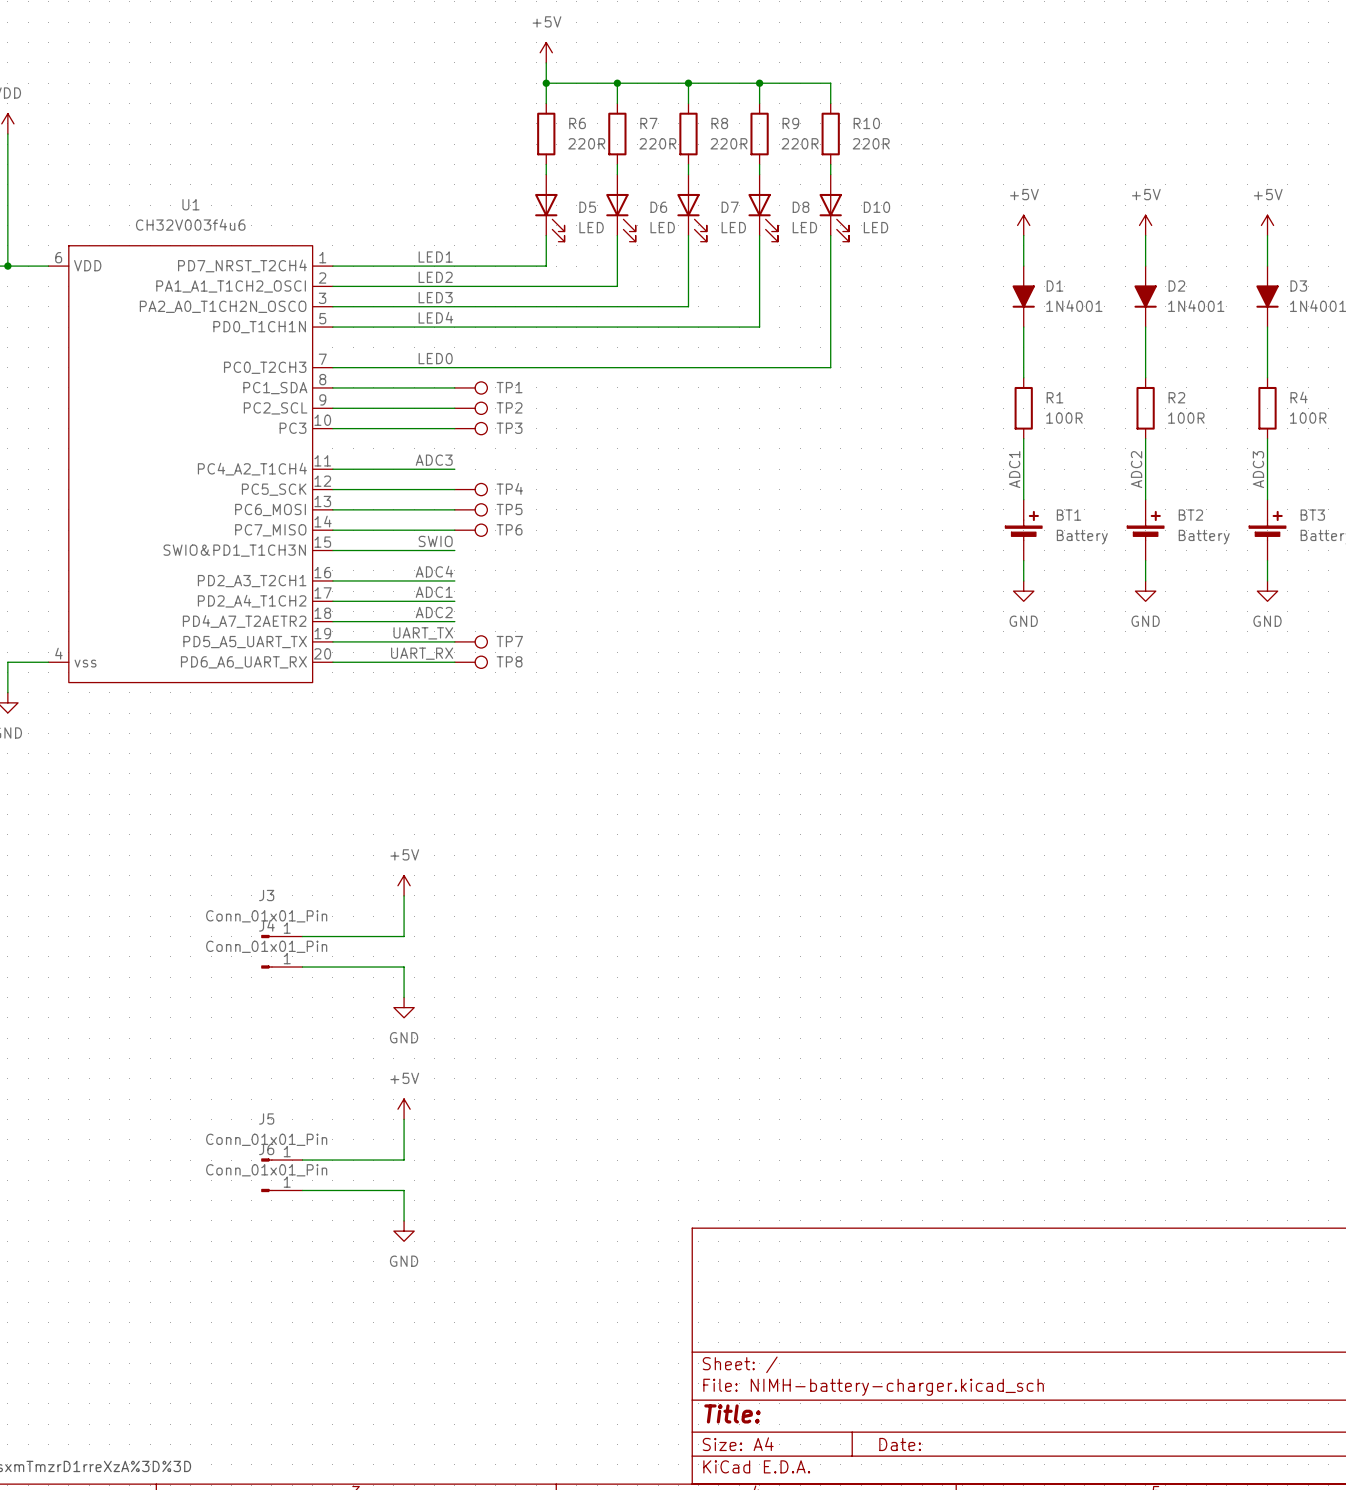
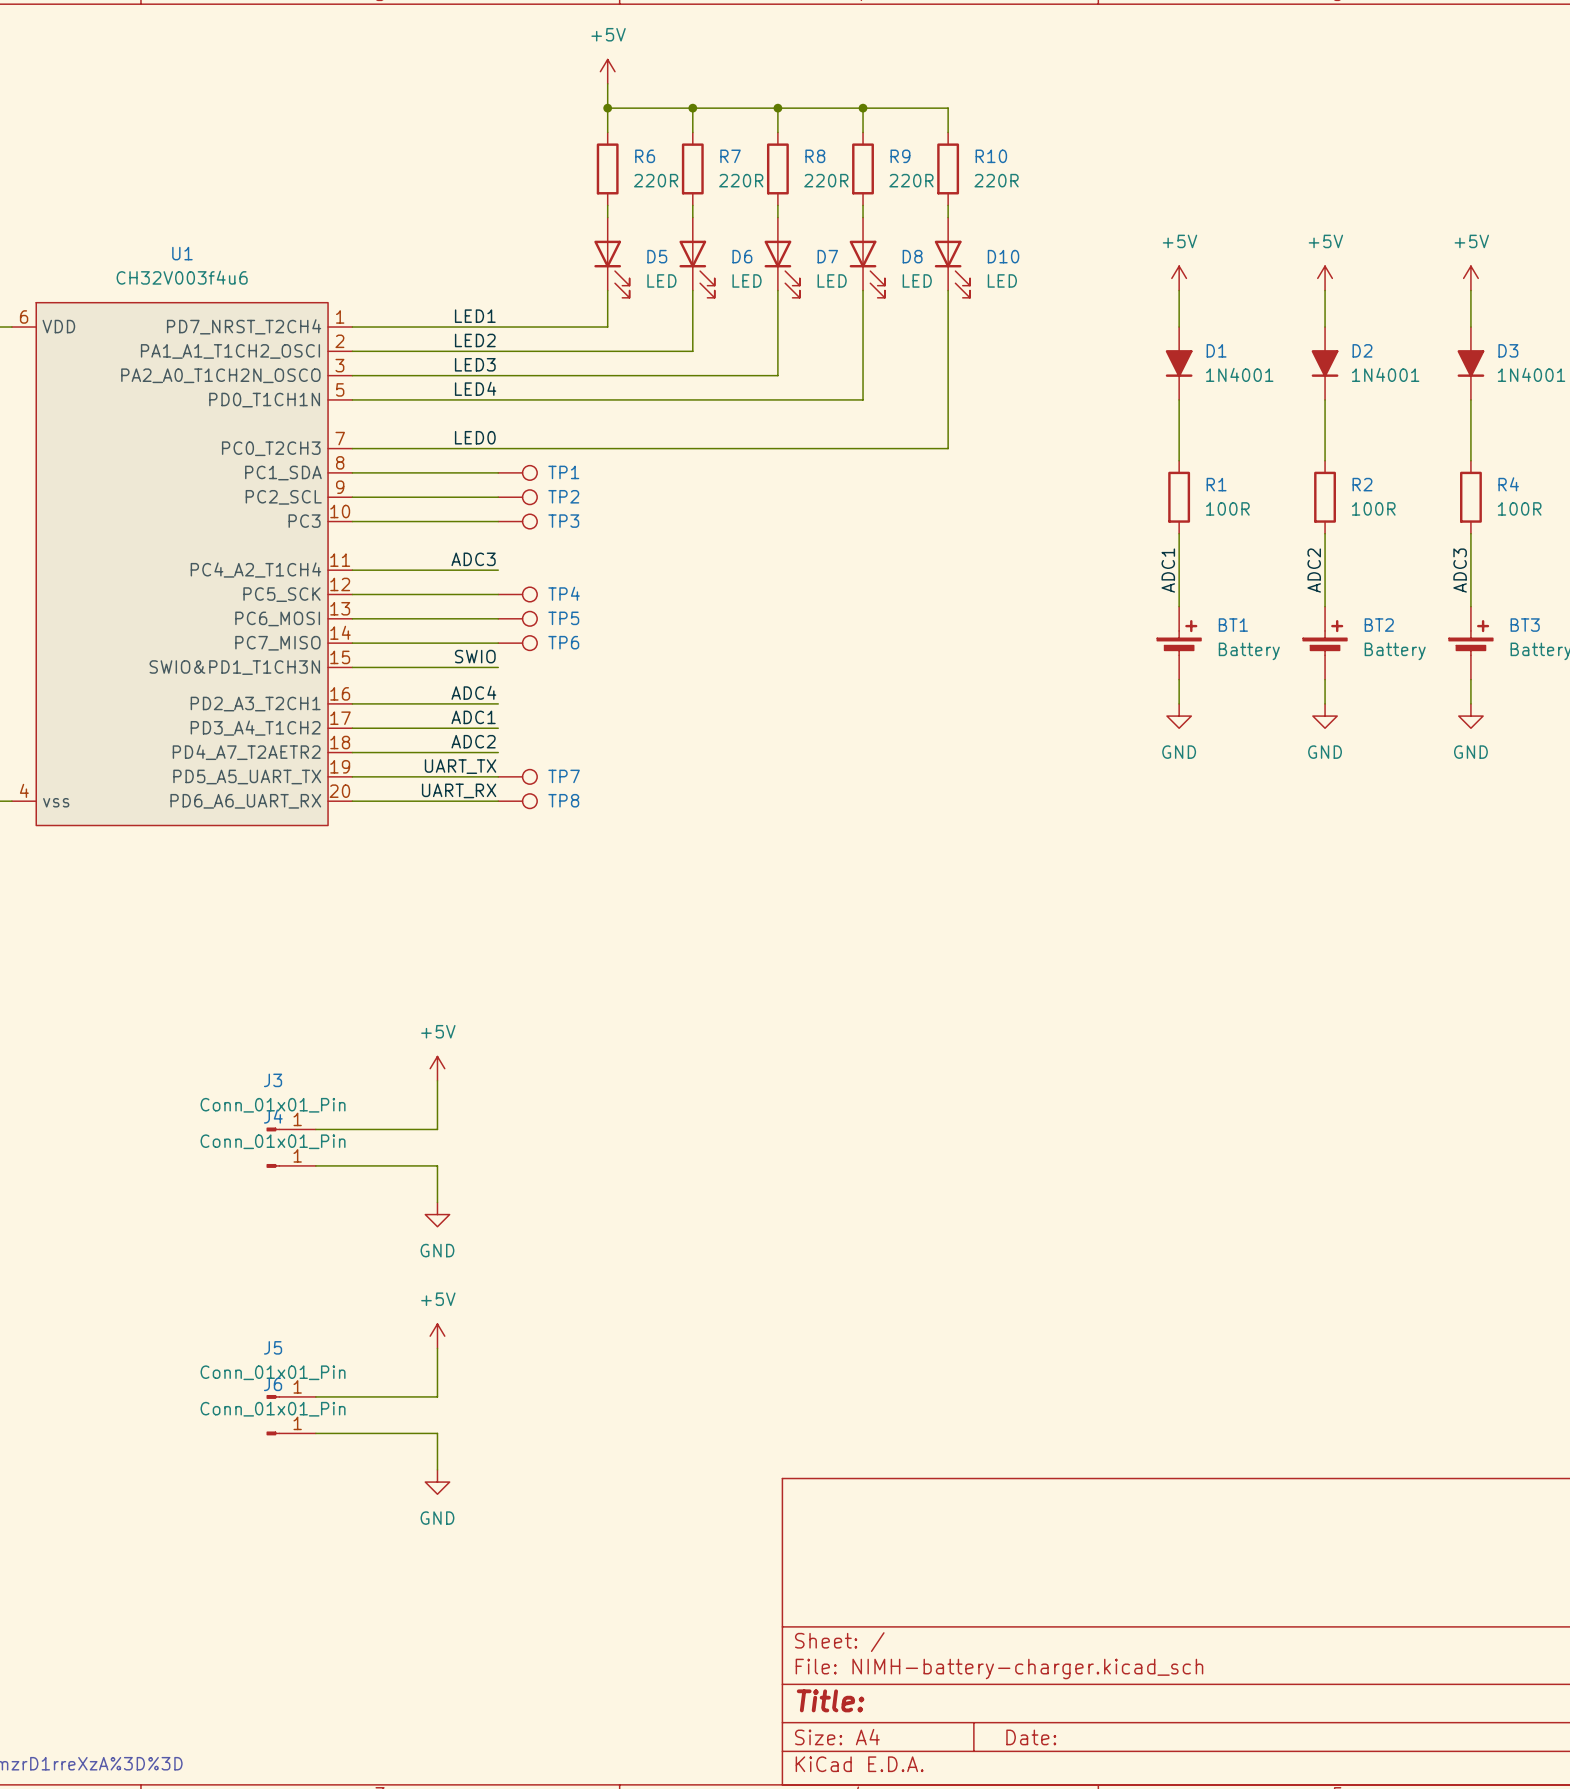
U1 pin name: PD2_A4_T1CH2 (252, 601) -> PD3_A4_T1CH2 (255, 728)

